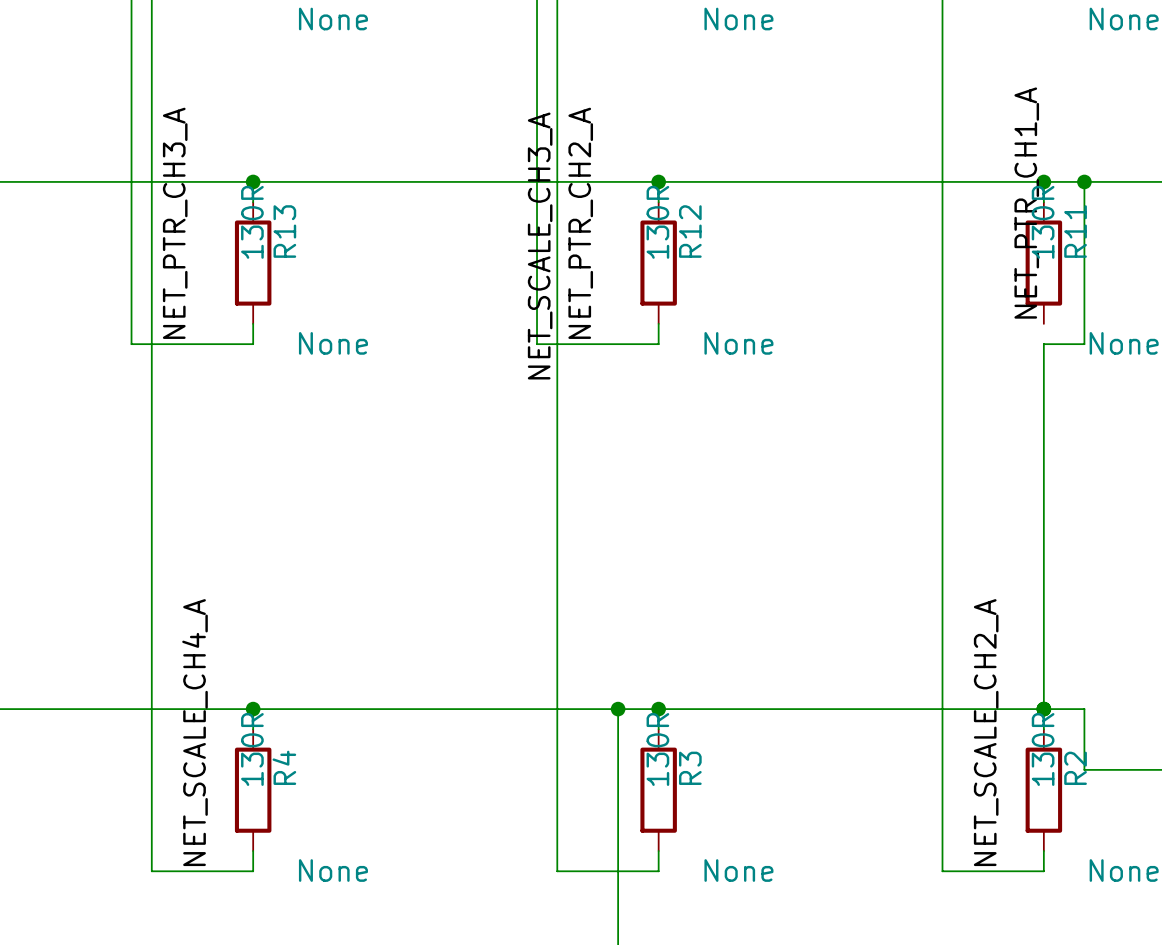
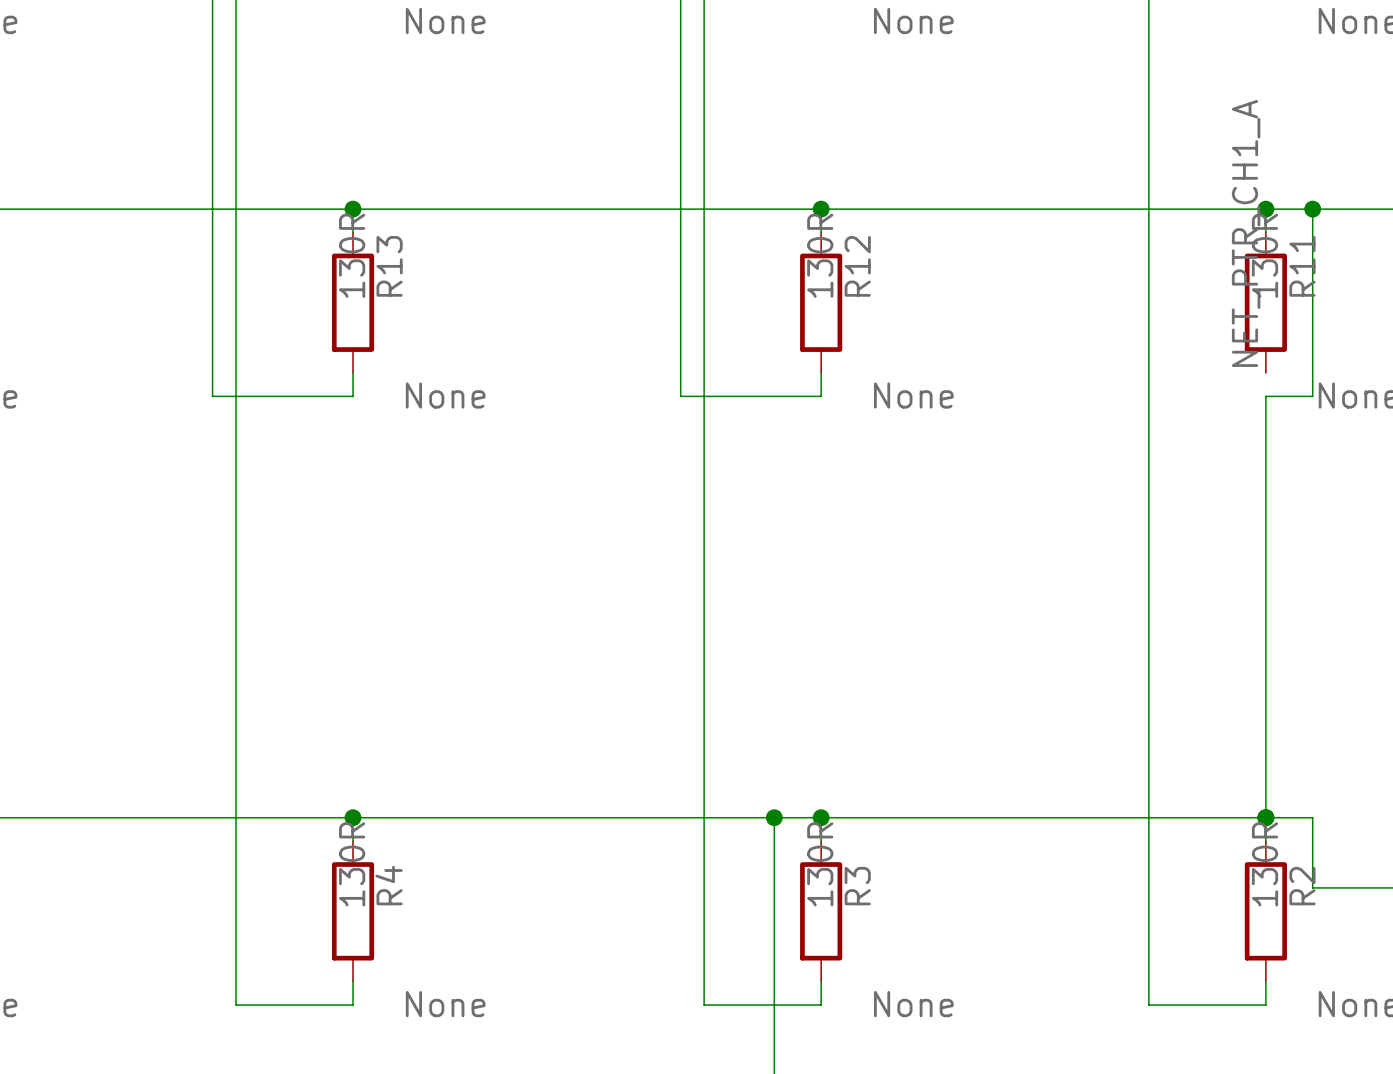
label: NET_PTR_CH3_A (175, 223) -> none
label: NET_PTR_CH2_A (580, 223) -> none
label: NET_SCALE_CH3_A (540, 246) -> none
label: NET_SCALE_CH4_A (195, 732) -> none
label: NET_SCALE_CH2_A (986, 732) -> none

